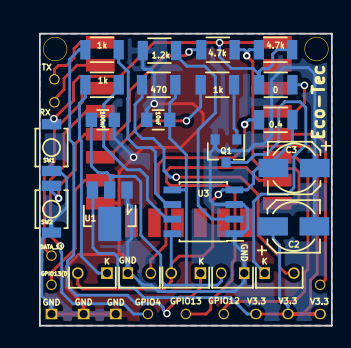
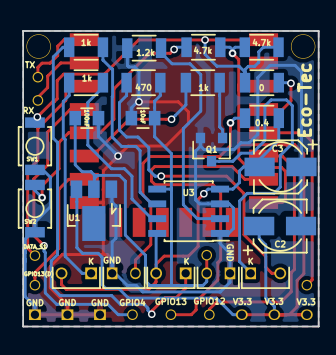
top track: none -> (206, 255) (206, 273)
part: none -> (206, 255)

